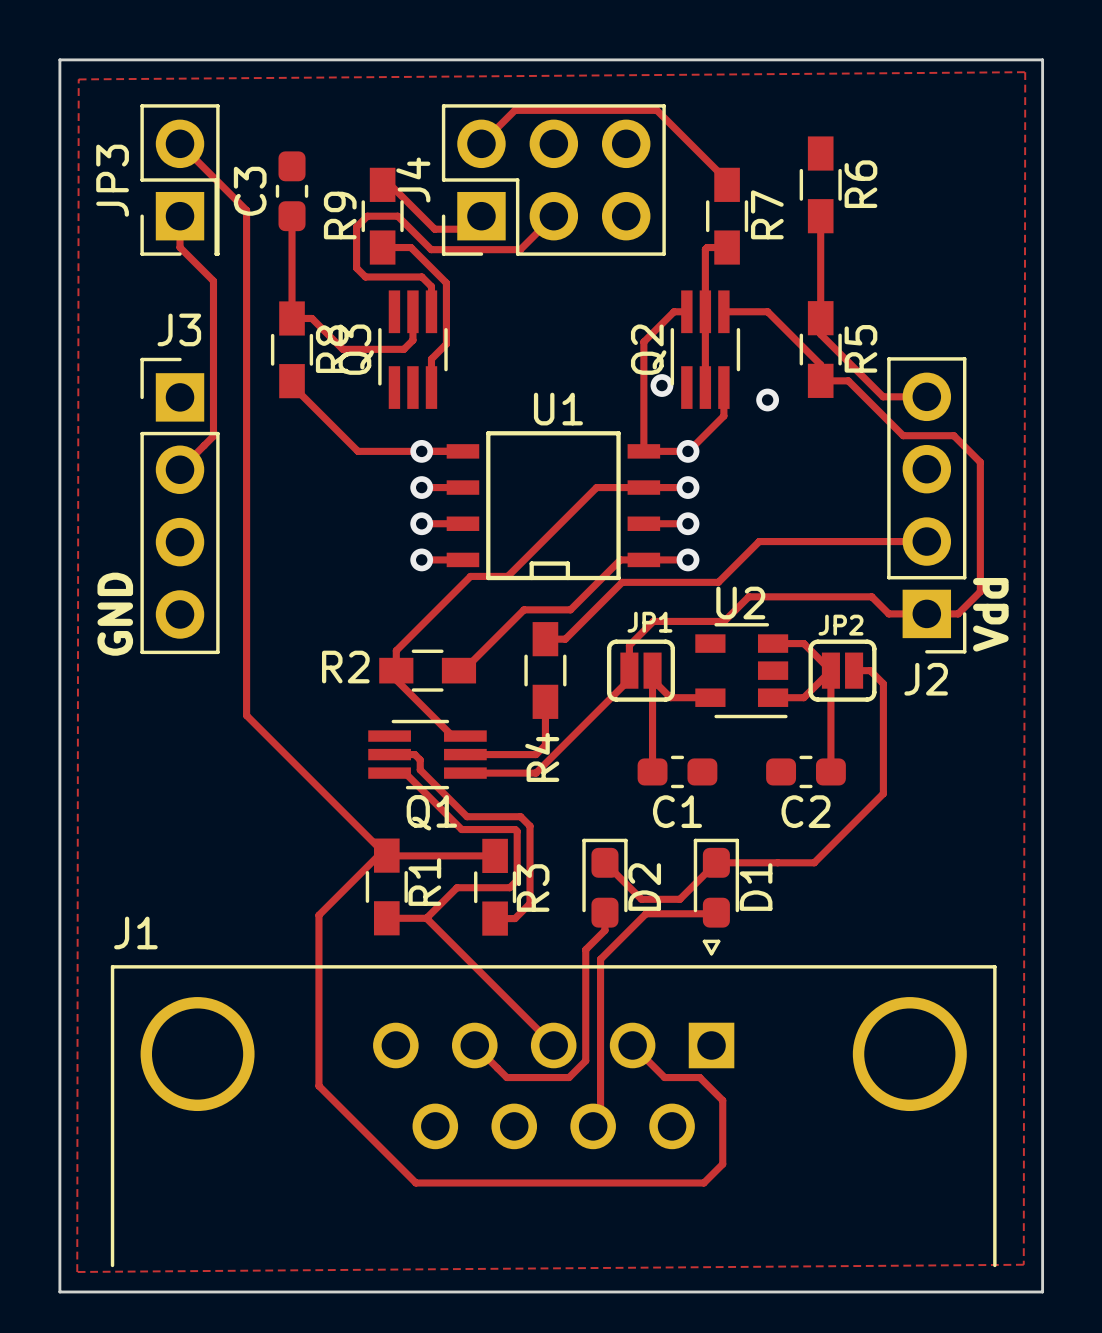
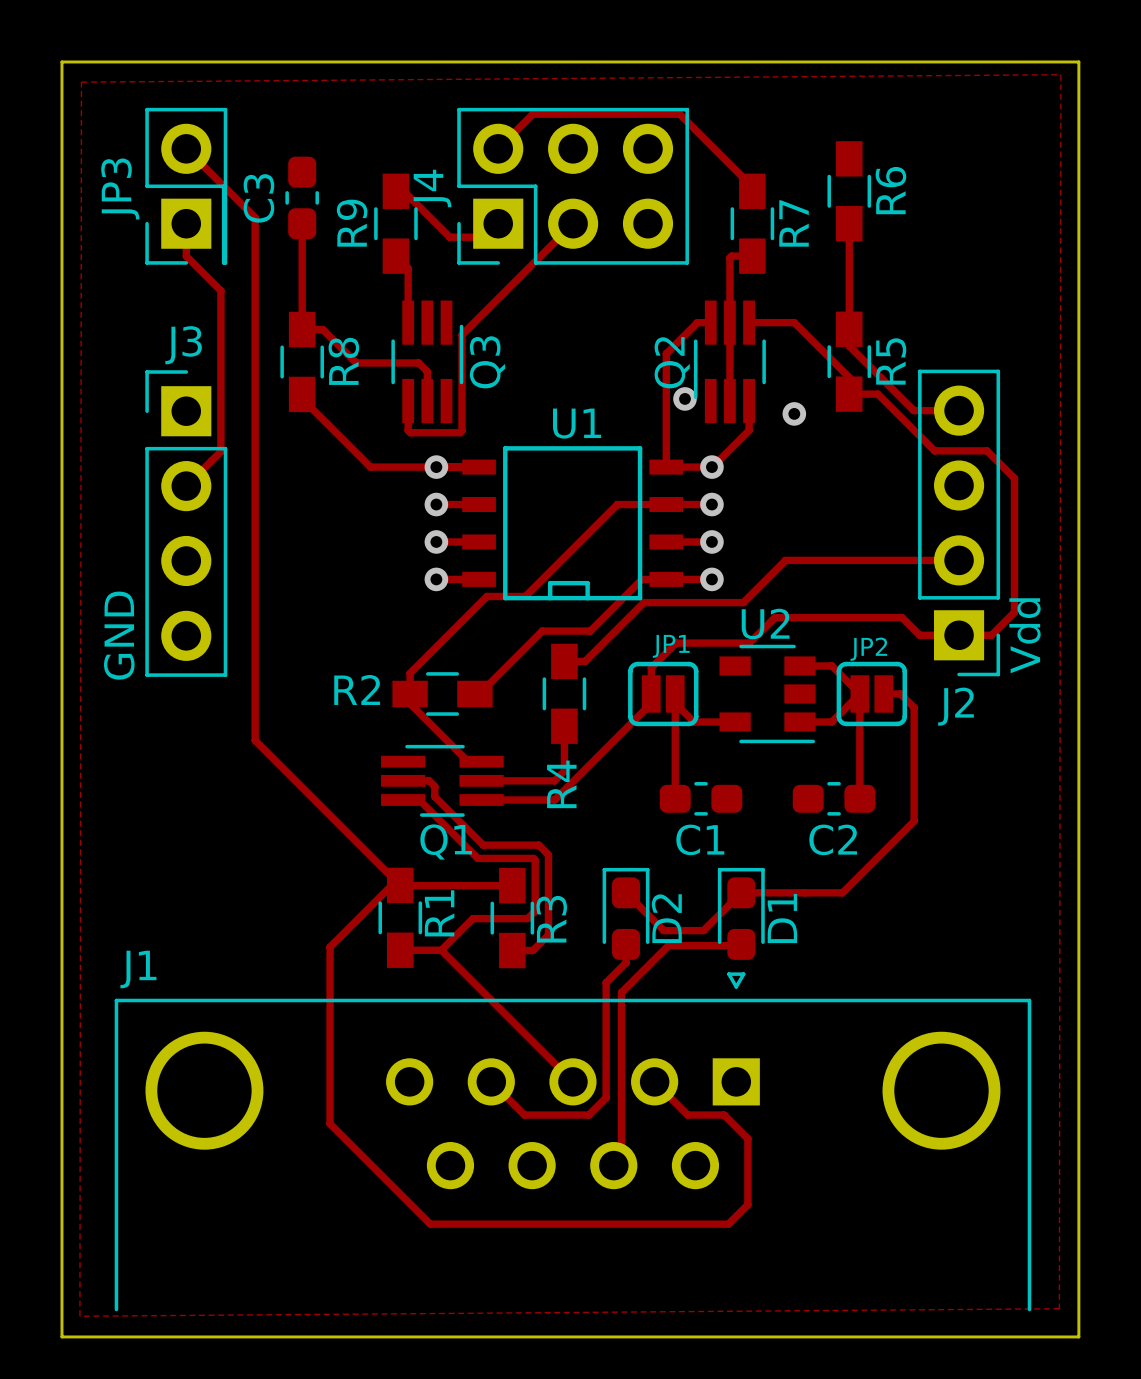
track: (382, 247) (410, 247) (446, 283) (446, 323) -> (395, 256) (408, 268) (408, 322)
track: (520, 249) (431, 249) (397, 216) (367, 216) (356, 227) (356, 268) (365, 276) (421, 276) (431, 286) (431, 311) -> (538, 258) (461, 334)
track: (412, 311) (412, 340) (403, 349) (342, 349) -> (427, 401) (427, 371) (418, 363) (354, 361)
track: (446, 344) (431, 359) (431, 387) -> (461, 356) (461, 430) (460, 432) (410, 432) (408, 430) (408, 401)
Q3 rotation: 0° (412, 349) -> 180° (427, 361)

